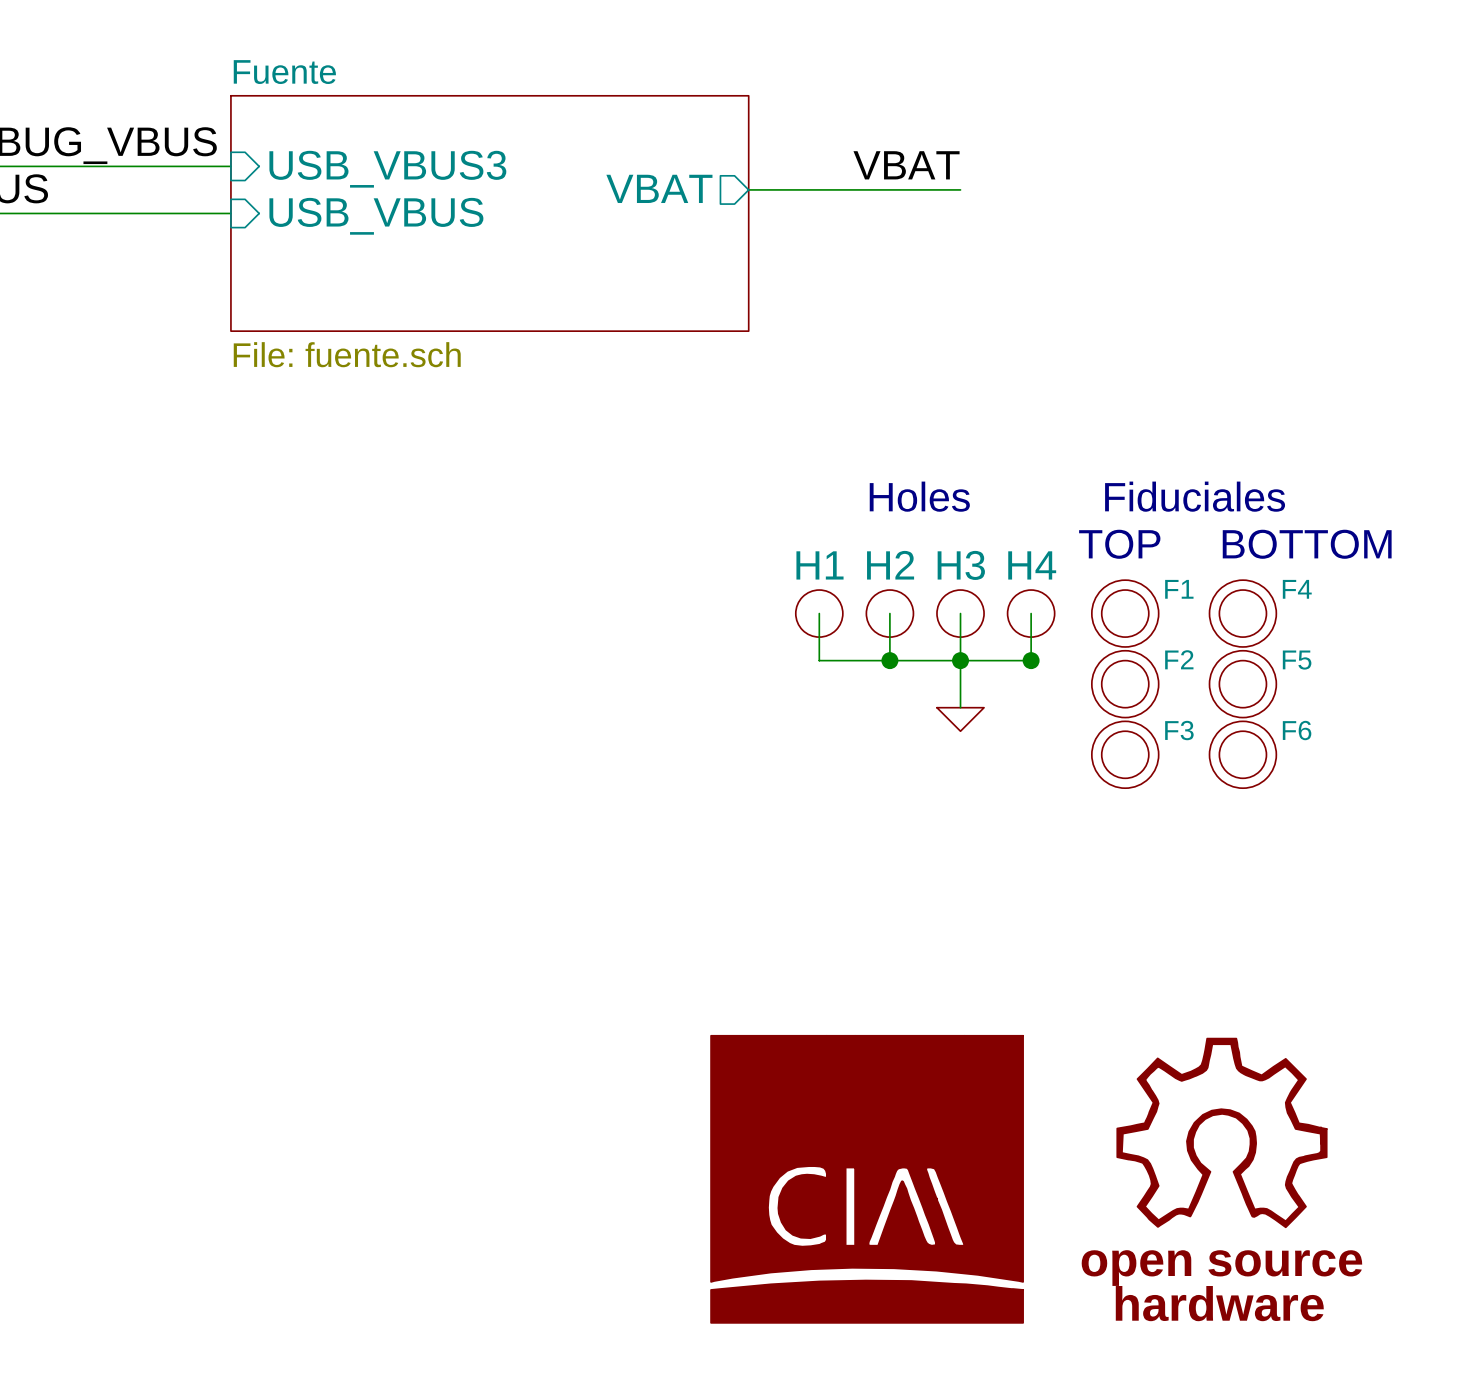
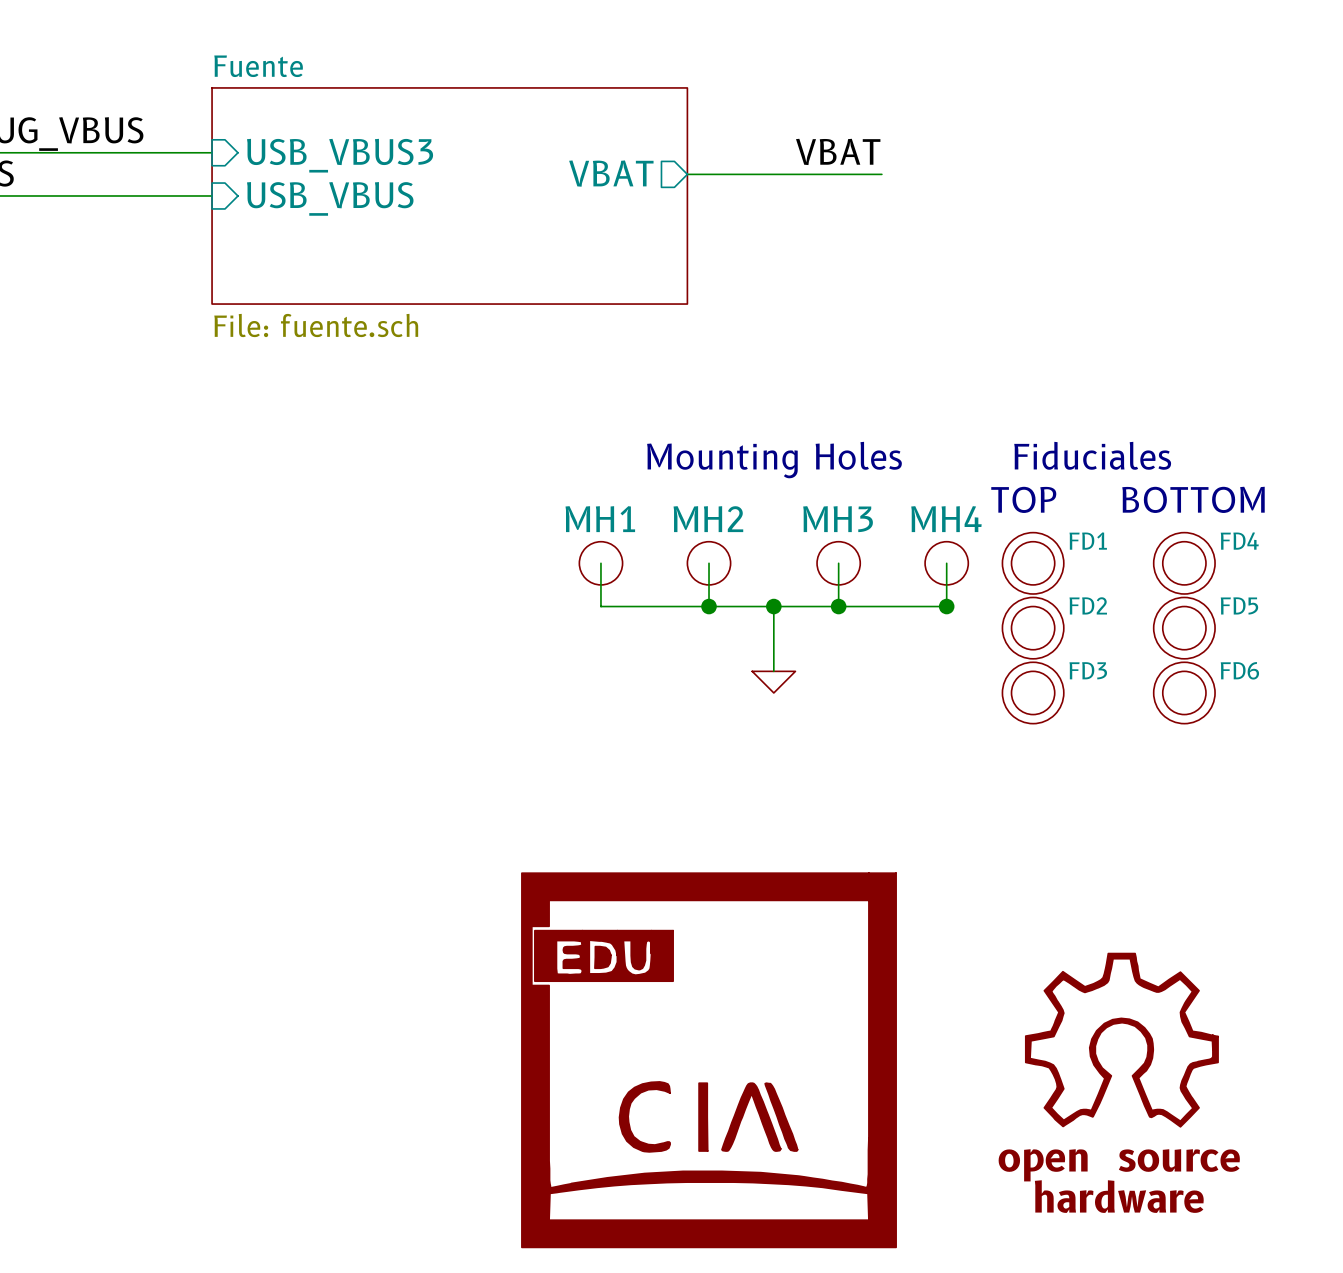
text: Holes (919, 496) -> none
text: none -> Mounting Holes (774, 460)
H4 name: H4 (1032, 565) -> MH4 (946, 519)
F1 name: F1 (1179, 589) -> FD1 (1088, 541)
MH1: none -> (600, 563)
wire: none -> (709, 563) (709, 606)
MH2: none -> (709, 563)
wire: (819, 613) (819, 660) -> (600, 563) (600, 606) (752, 606)
H1: (819, 613) -> none
wire: (889, 613) (889, 660) -> (838, 563) (838, 606)
H2: (889, 613) -> none
MH3: none -> (838, 563)
wire: (960, 613) (960, 707) -> none
H3: (960, 613) -> none
F4: (1242, 613) -> none
FD4: none -> (1184, 563)
F2 name: F2 (1179, 659) -> FD2 (1088, 605)
junction: none -> (709, 606)
wire: none -> (773, 606) (773, 671)
junction: none -> (773, 606)
junction: (889, 660) -> none
junction: none -> (838, 606)
junction: (960, 660) -> none
F5: (1242, 684) -> none
FD5: none -> (1184, 628)
power symbol position: (960, 719) -> (773, 682)
F3 name: F3 (1179, 730) -> FD3 (1088, 670)
F6: (1242, 754) -> none
FD6: none -> (1184, 692)
power symbol: none -> (709, 1060)
part: (867, 1179) -> none

